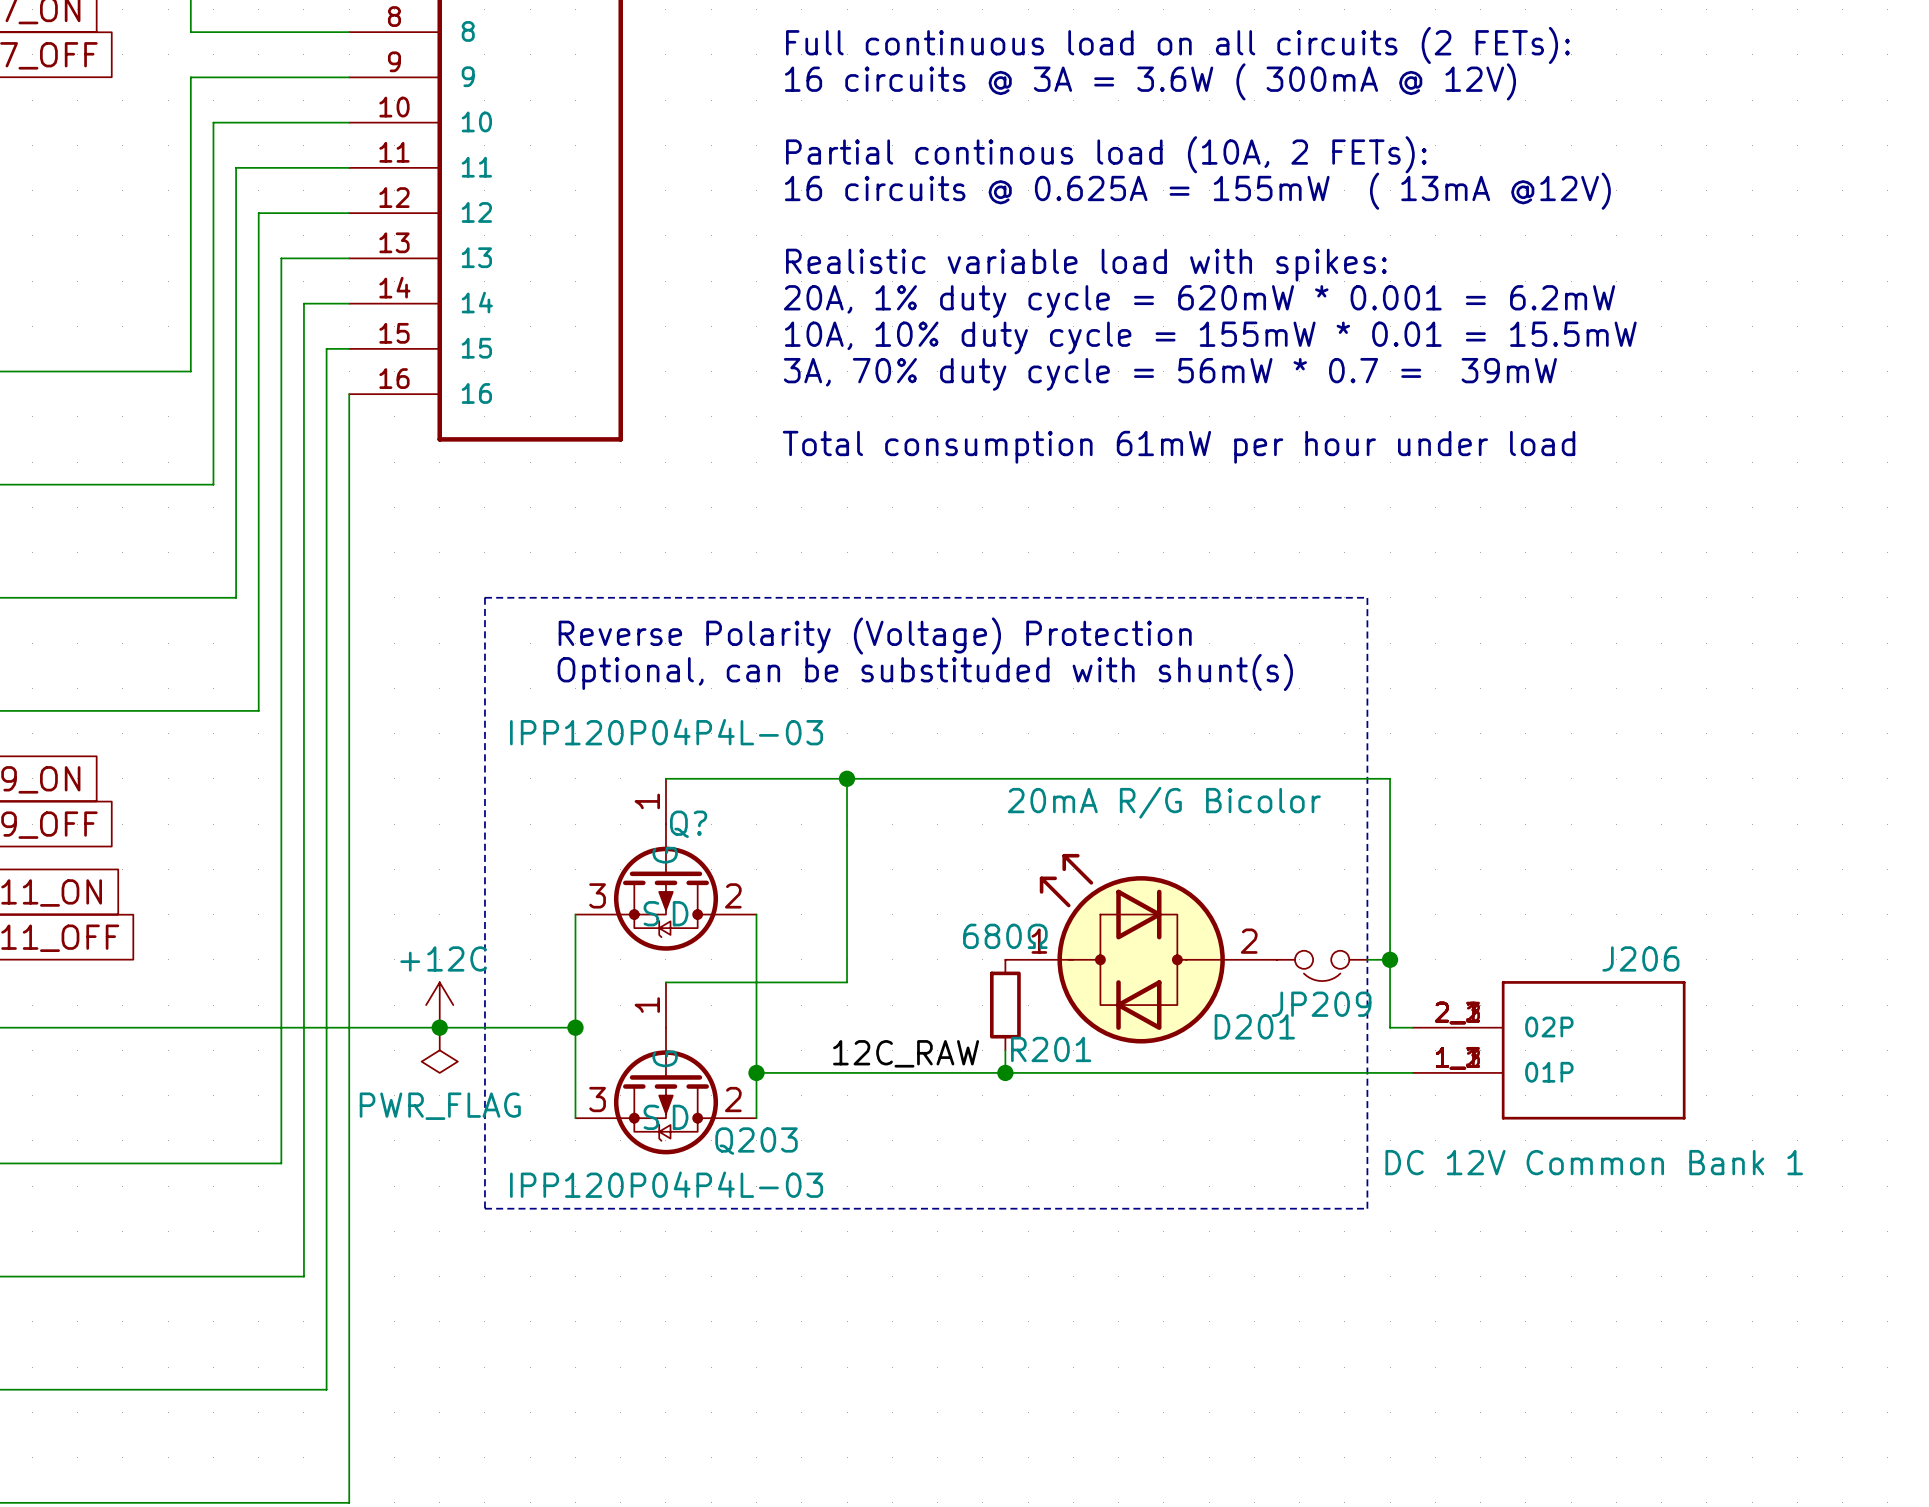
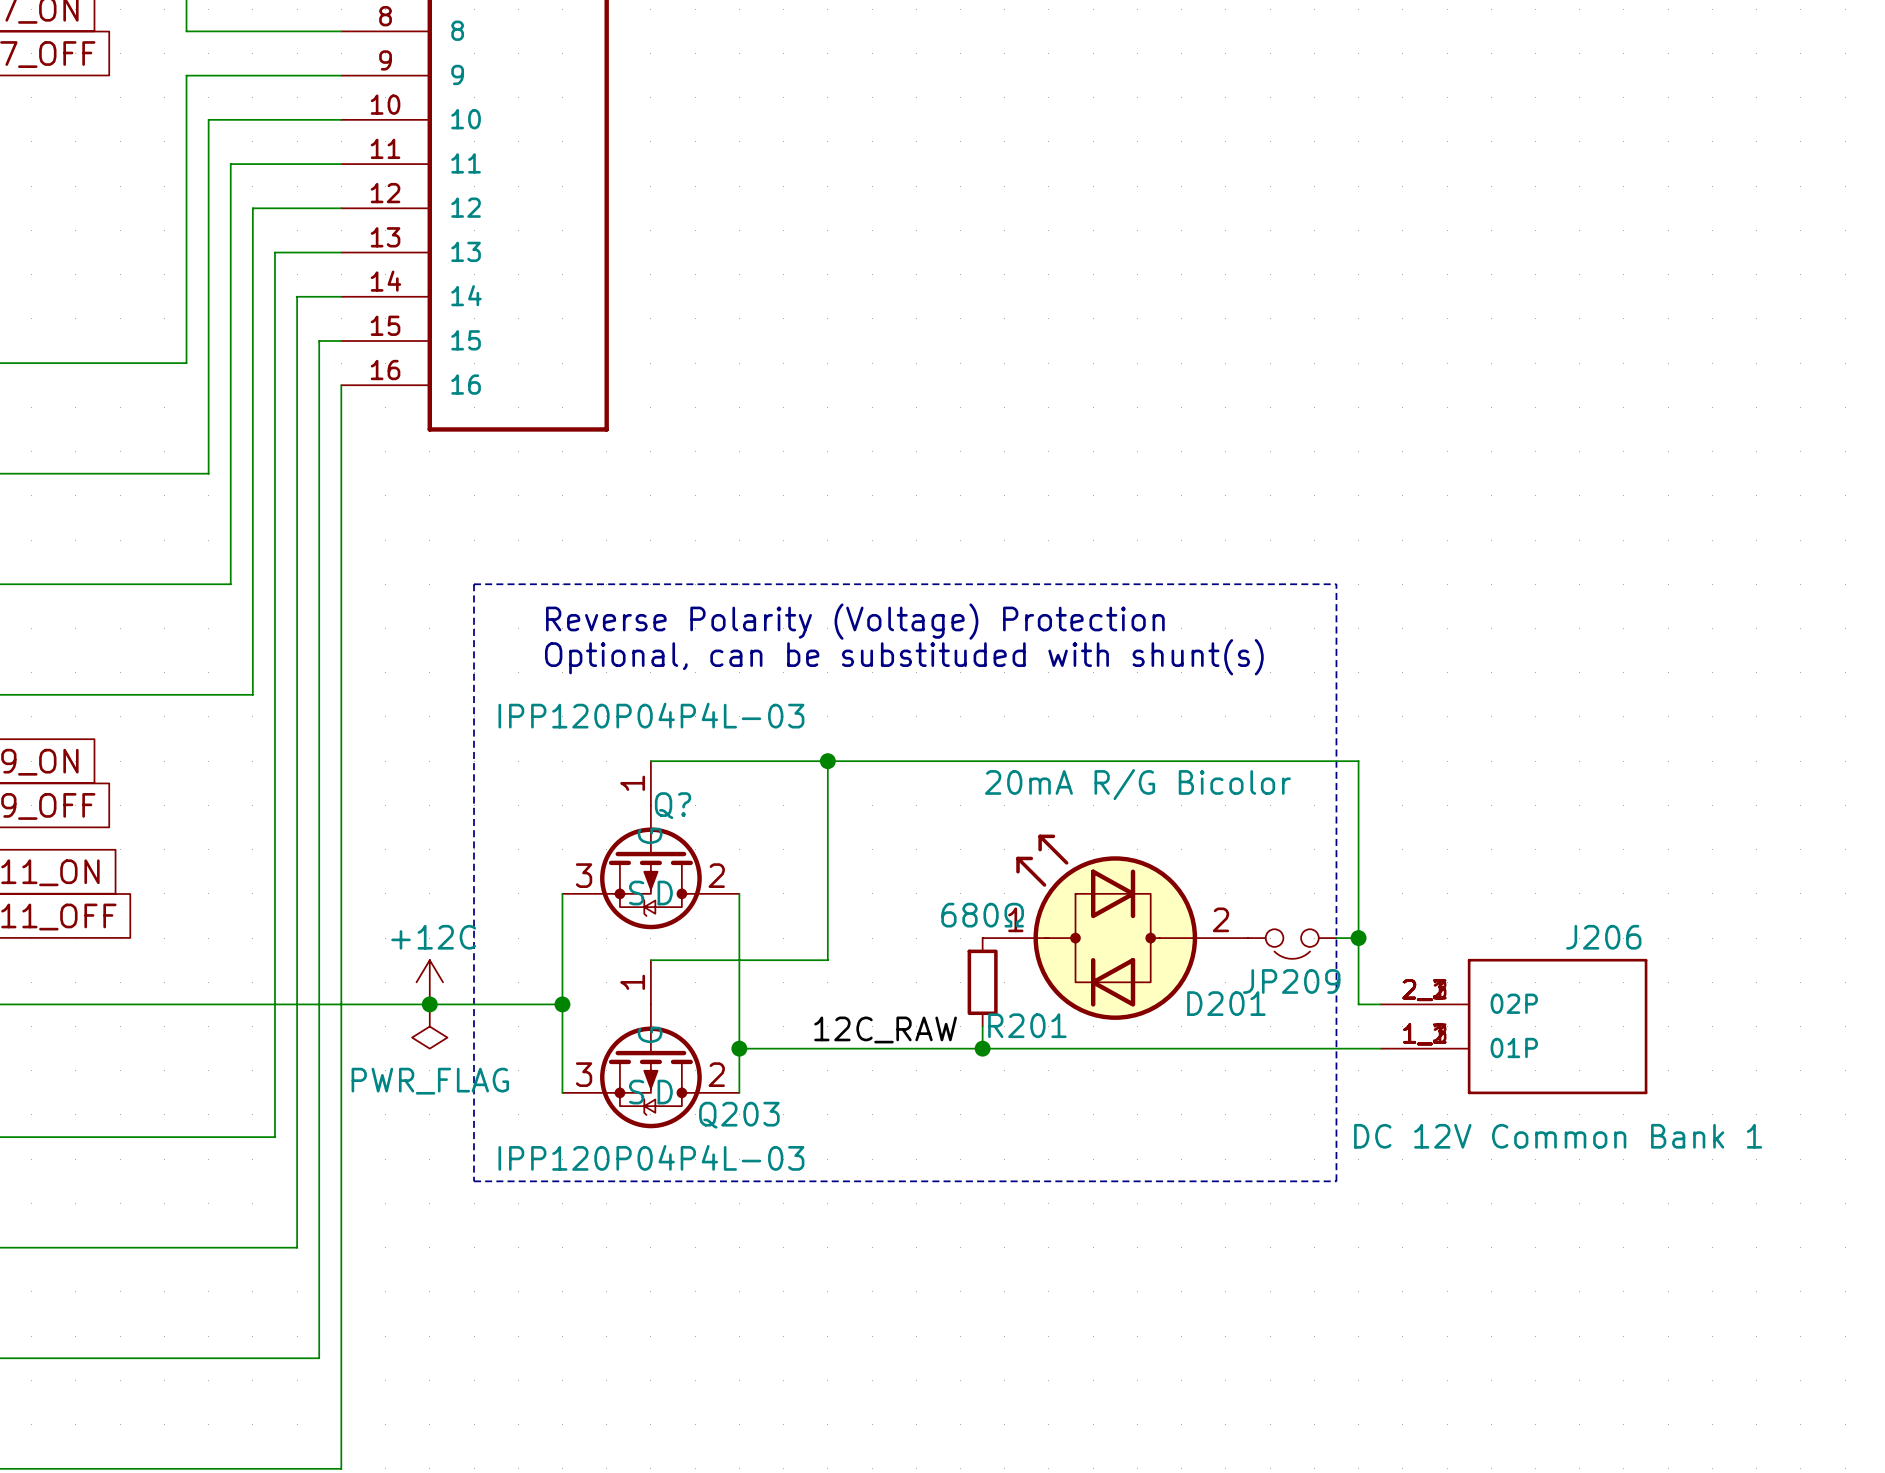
text: Full continuous load on all circuits (2 FETs): (1177, 45) -> none
text: 16 circuits @ 3A = 3.6W ( 300mA @ 12V) (1150, 81) -> none
text: Partial continous load (10A, 2 FETs): (1106, 154) -> none
text: 16 circuits @ 0.625A = 155mW ( 13mA @12V) (1197, 191) -> none
text: Realistic variable load with spikes: (1086, 265) -> none
text: 20A, 1% duty cycle = 620mW * 0.001 = 6.2mW (1199, 301) -> none
text: 10A, 10% duty cycle = 155mW * 0.01 = 15.5mW (1210, 337) -> none
text: 3A, 70% duty cycle = 56mW * 0.7 = 39mW (1170, 374) -> none
text: Total consumption 61mW per hour under load (1179, 447) -> none

